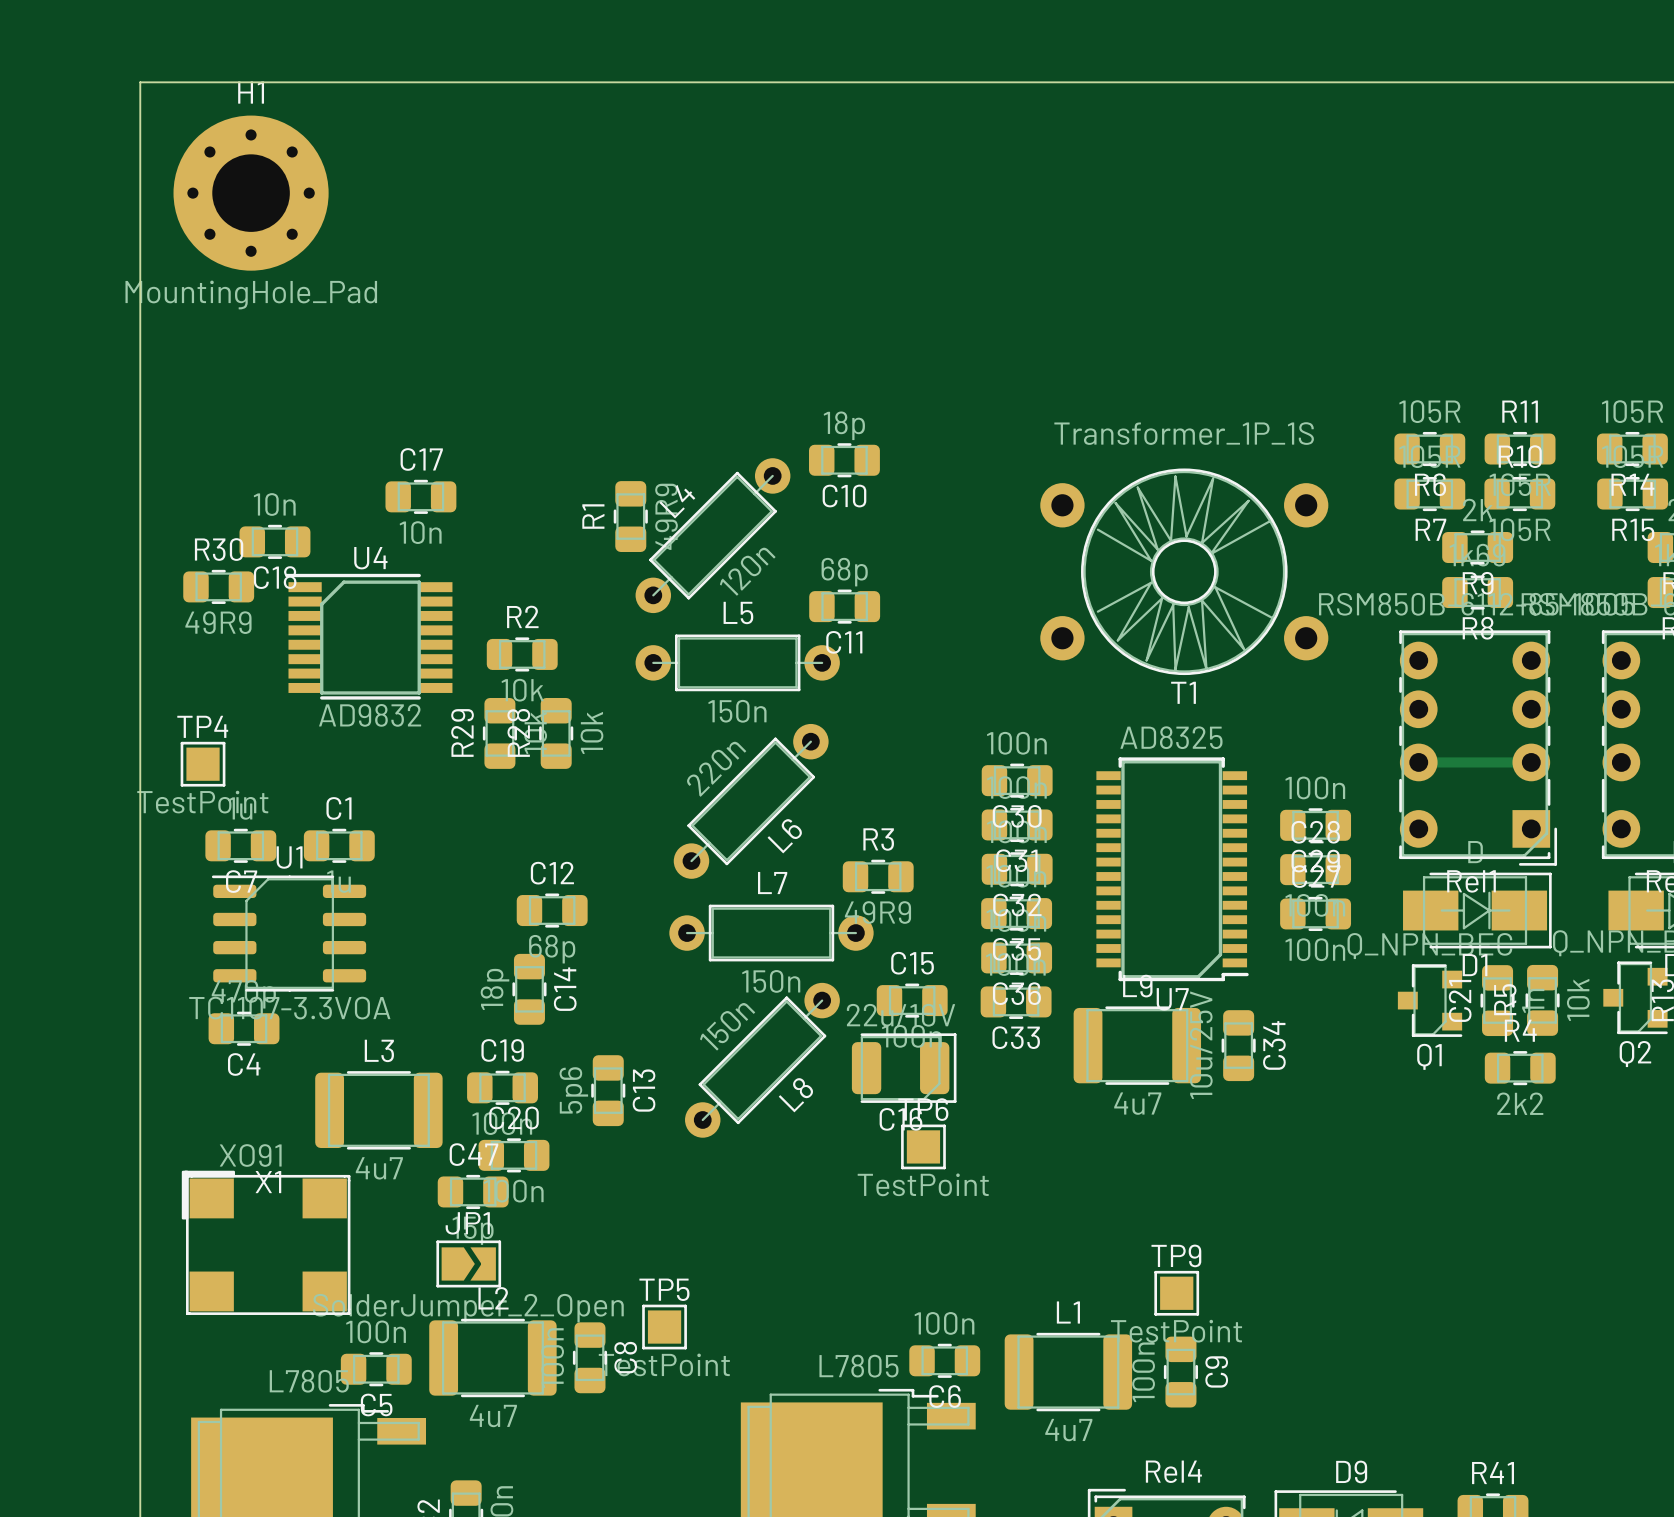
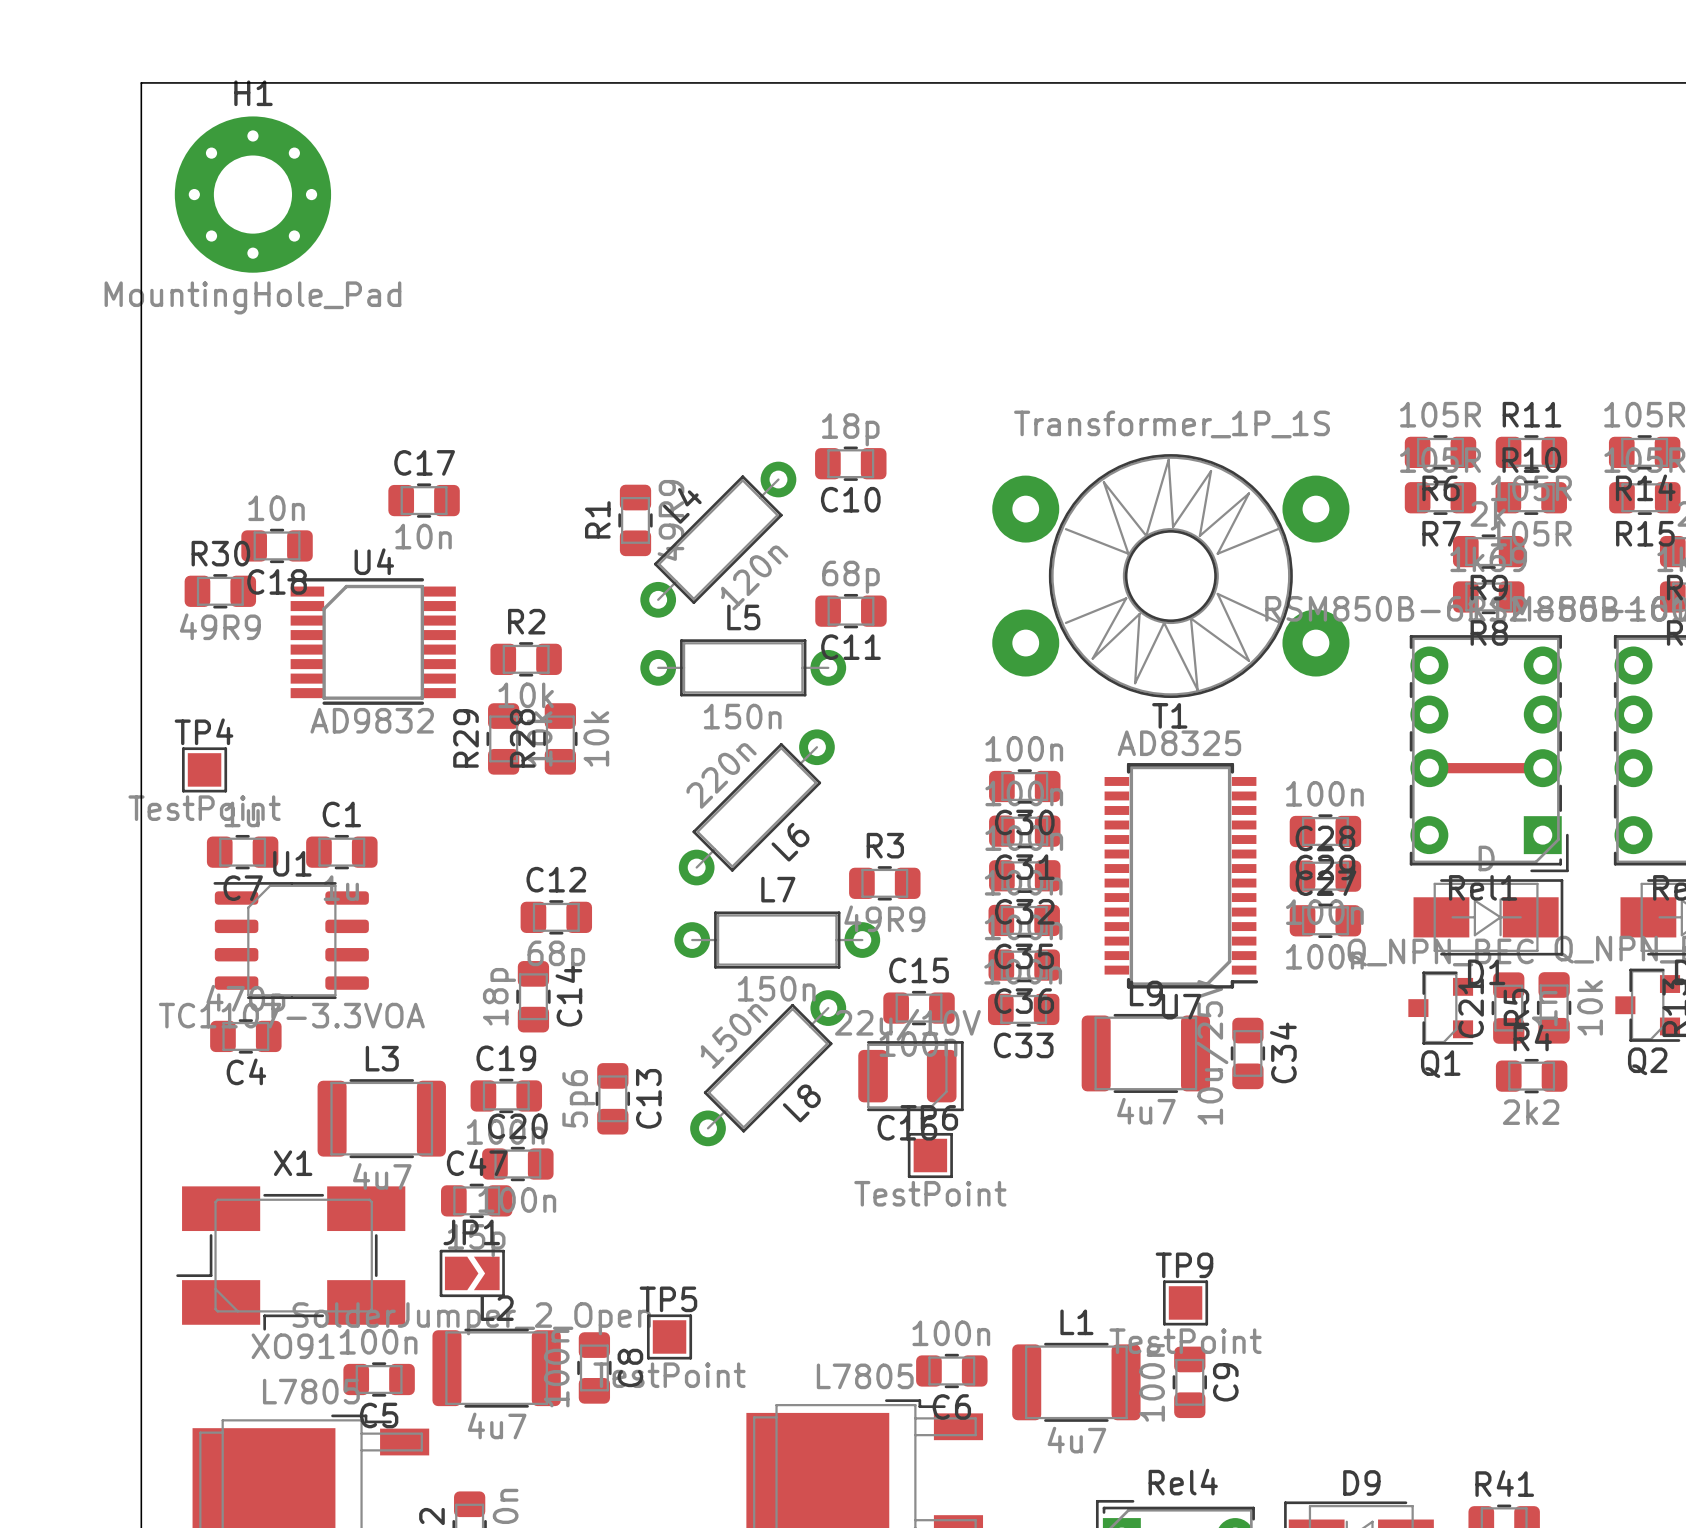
T1 footprint: [1040, 468, 1329, 676] -> [992, 454, 1350, 699]
X1 value position: XO91 (250, 1155) -> XO91 (293, 1346)
X1 footprint: [181, 1170, 351, 1315] -> [176, 1186, 406, 1331]

